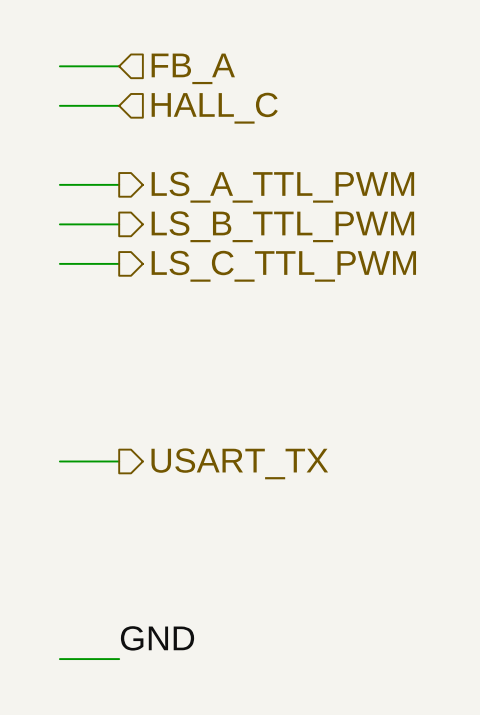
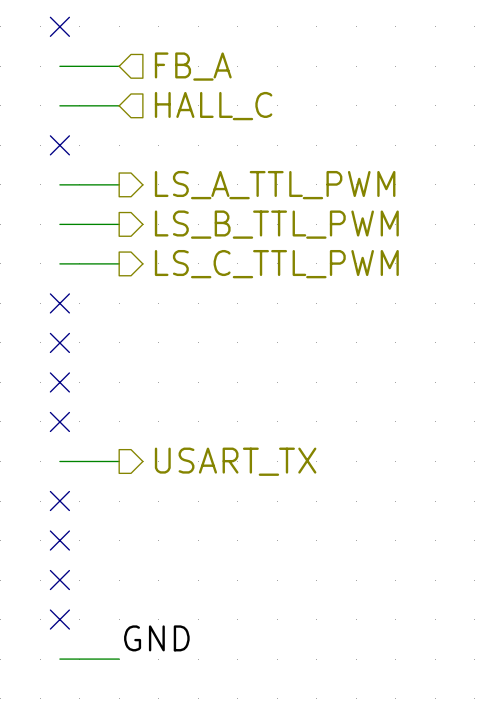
no-connect mark: none -> (59, 26)
no-connect mark: none -> (59, 145)
no-connect mark: none -> (59, 303)
no-connect mark: none -> (59, 342)
no-connect mark: none -> (59, 382)
no-connect mark: none -> (59, 421)
no-connect mark: none -> (59, 501)
no-connect mark: none -> (59, 540)
no-connect mark: none -> (59, 580)
no-connect mark: none -> (59, 619)

